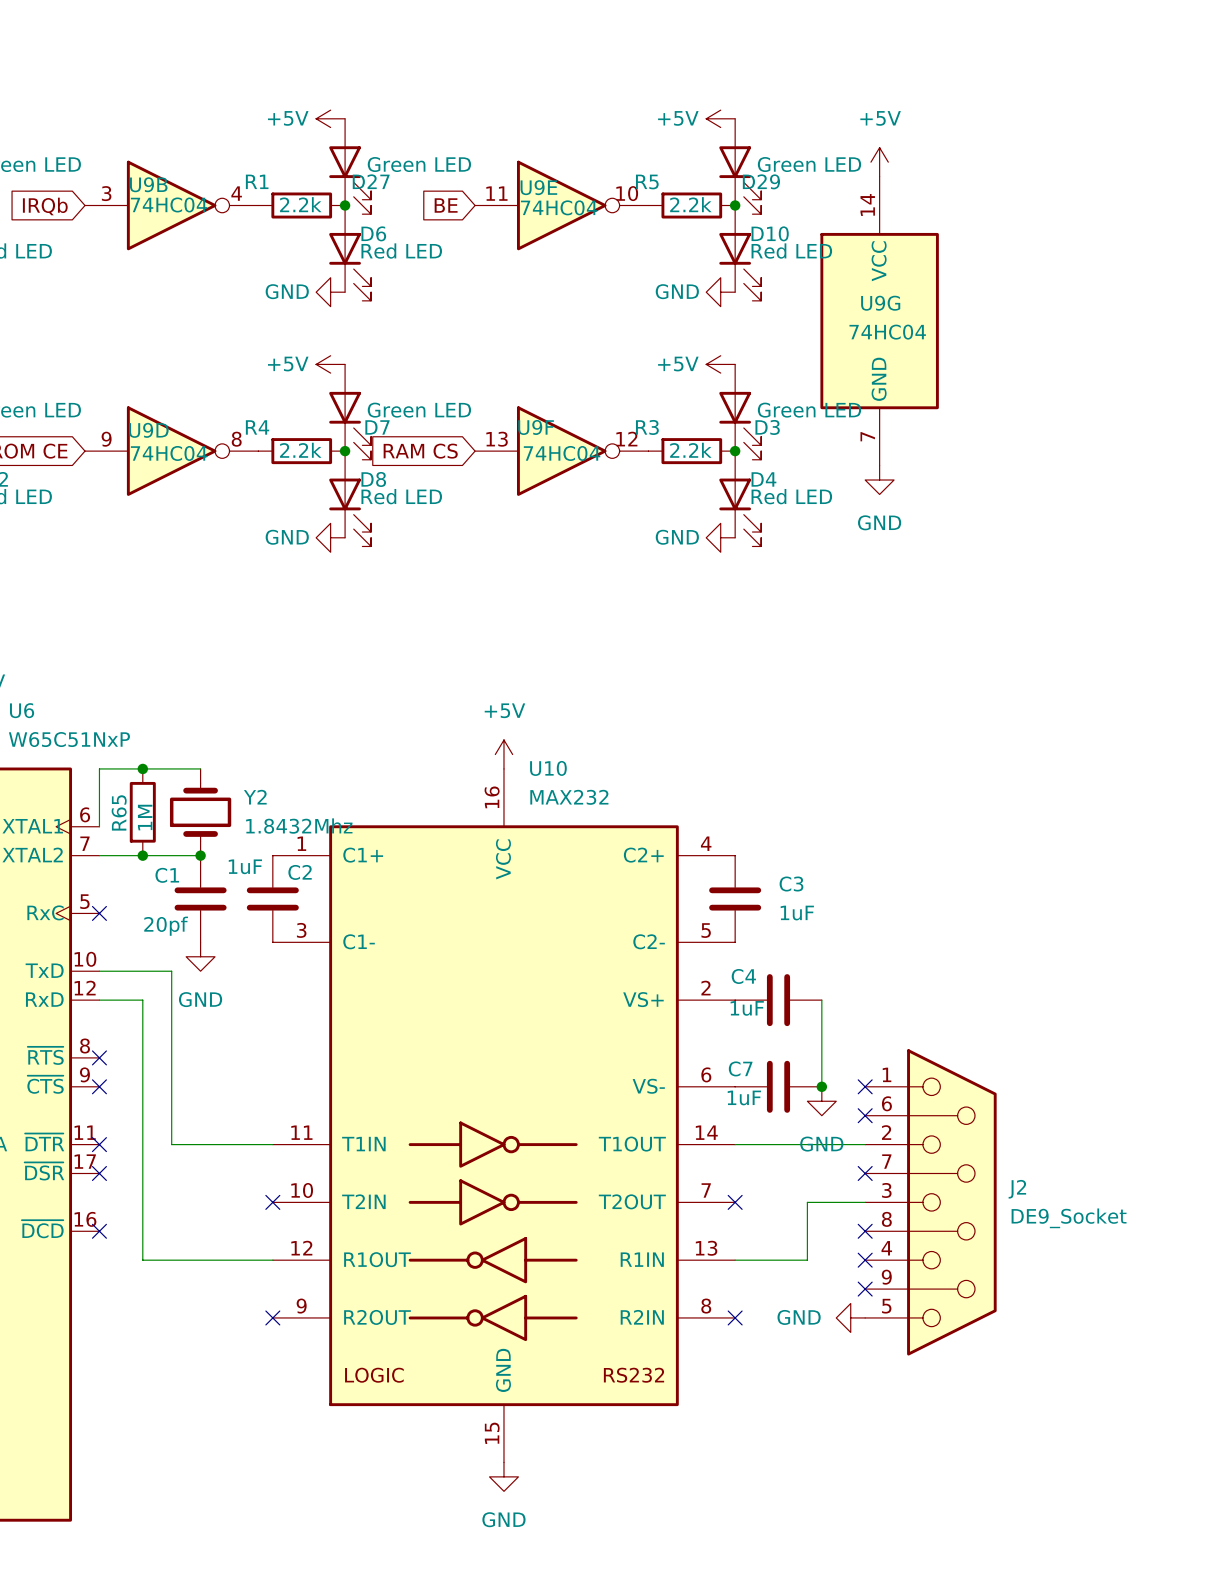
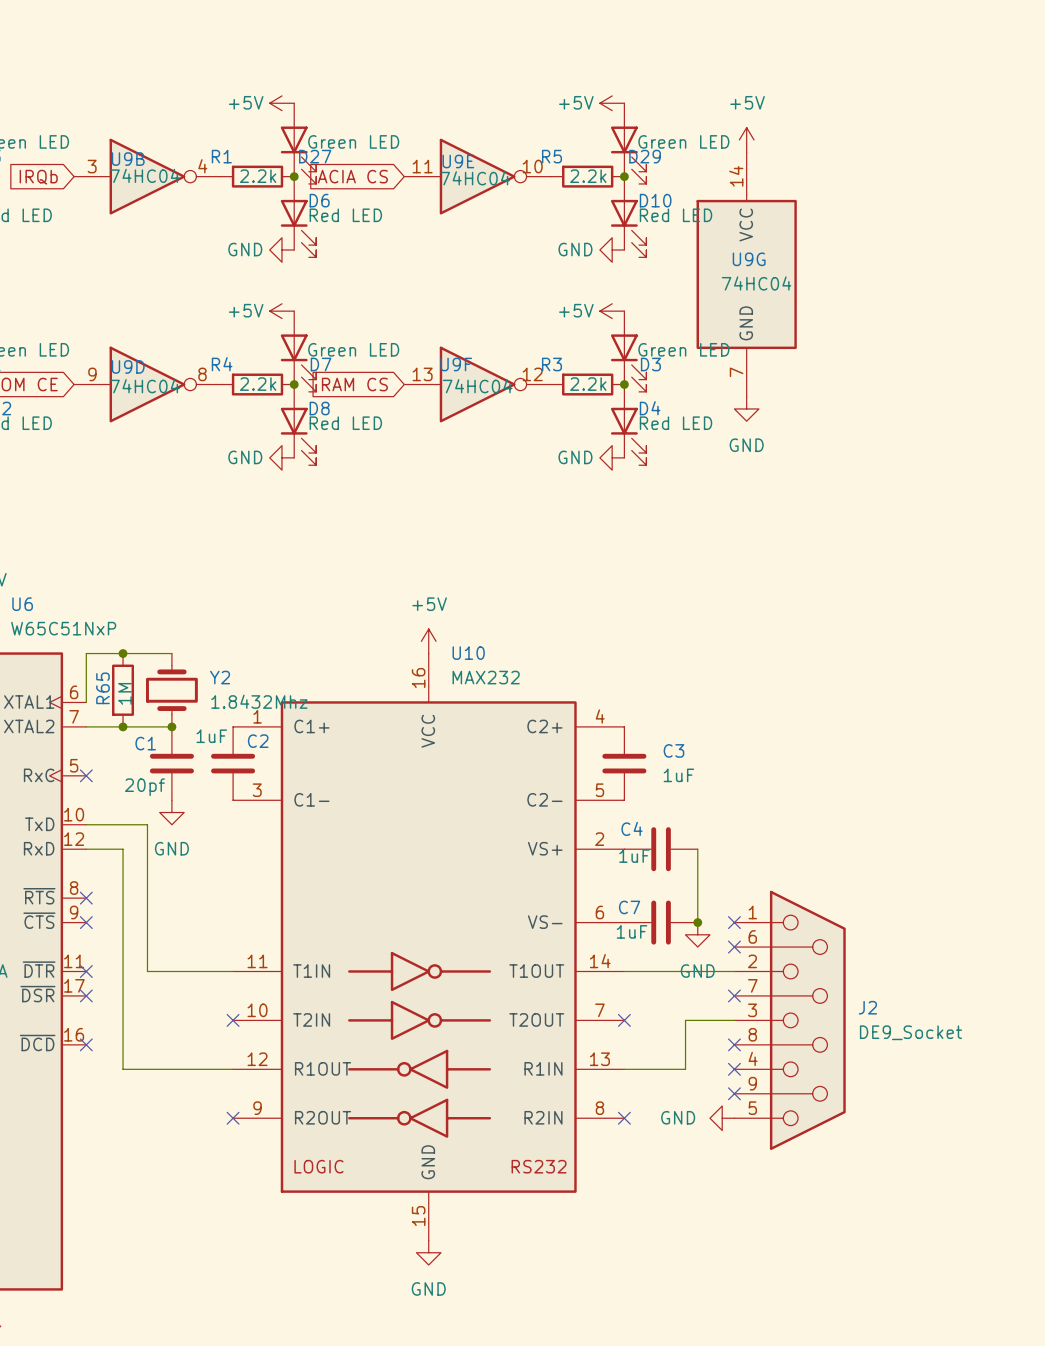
global label: BE (446, 205) -> ACIA CS (352, 176)

